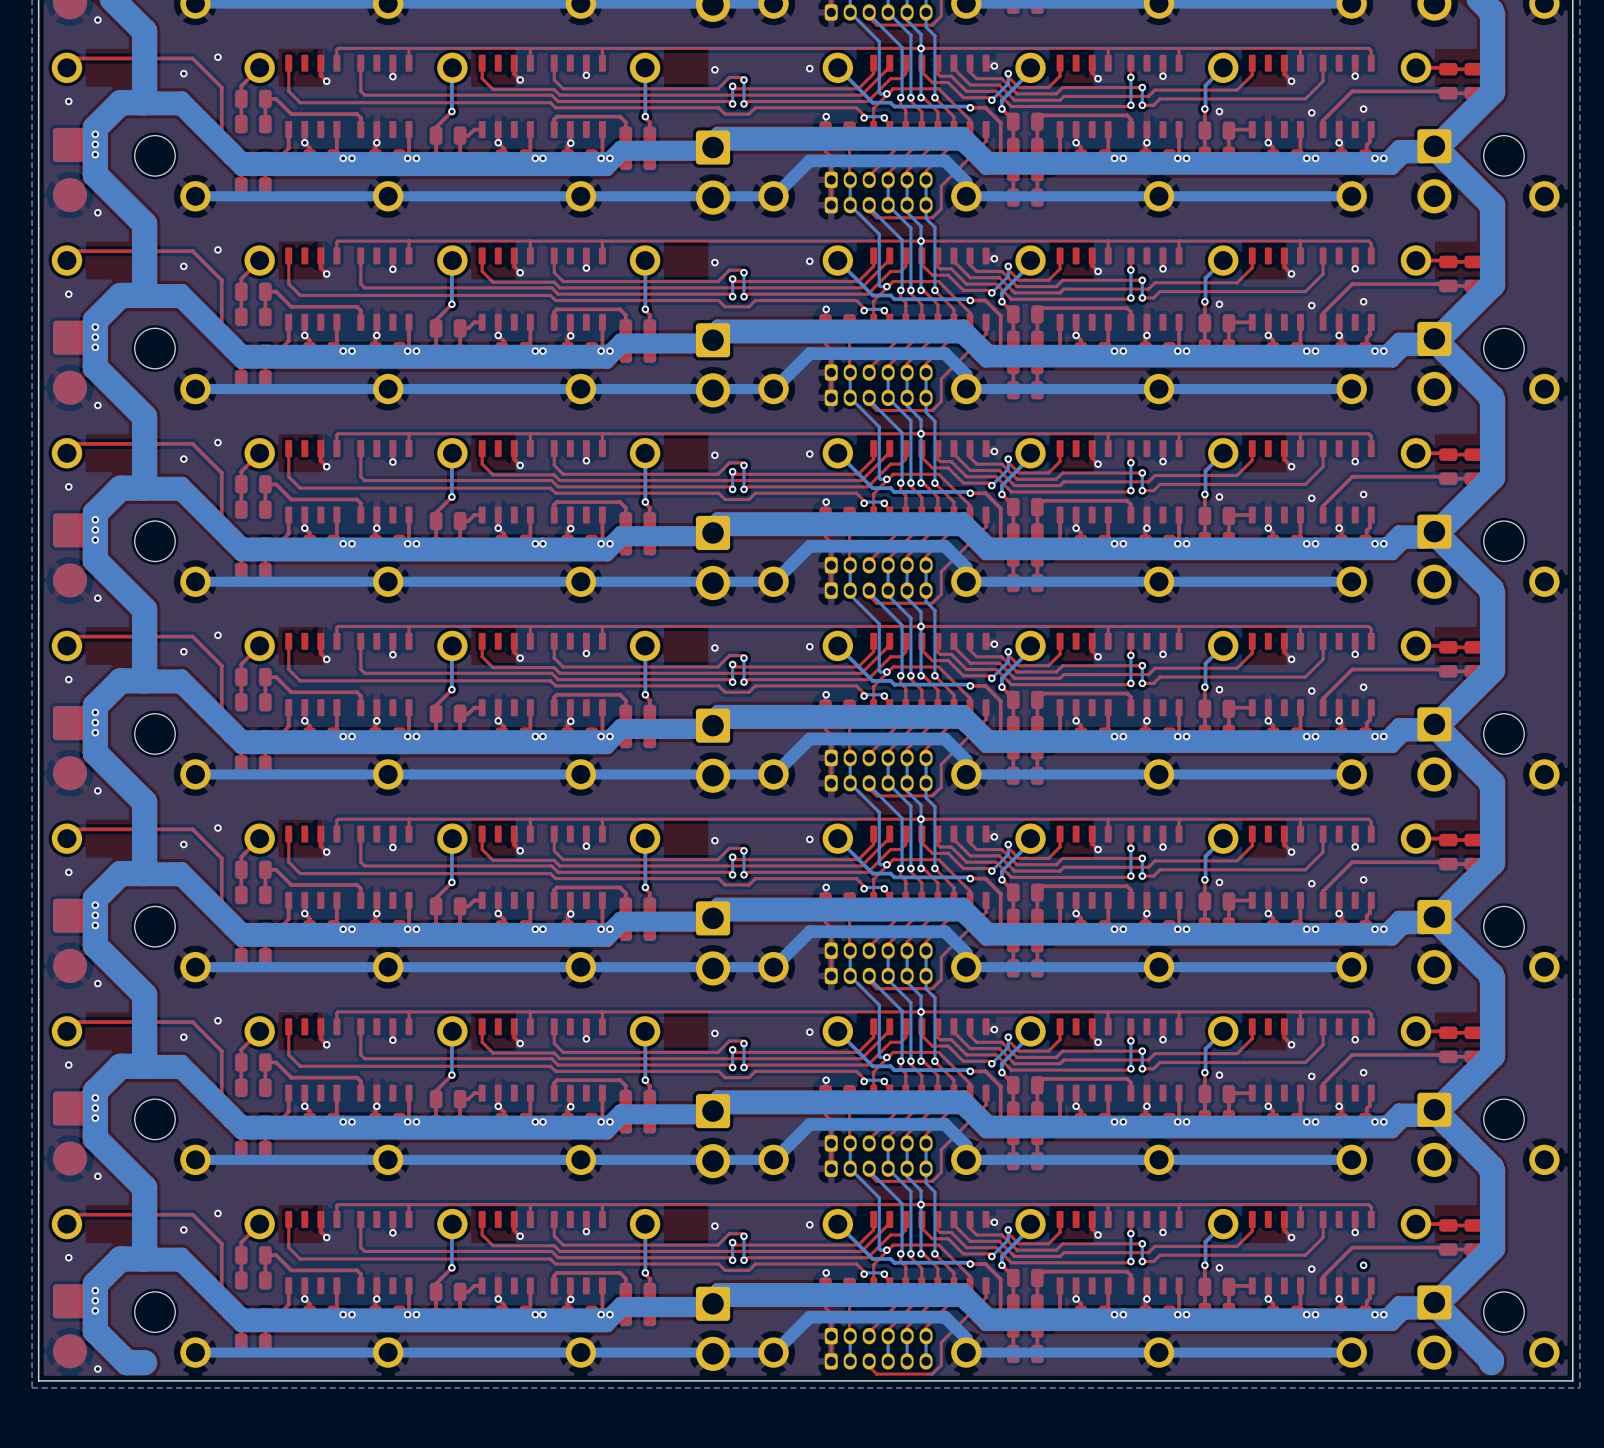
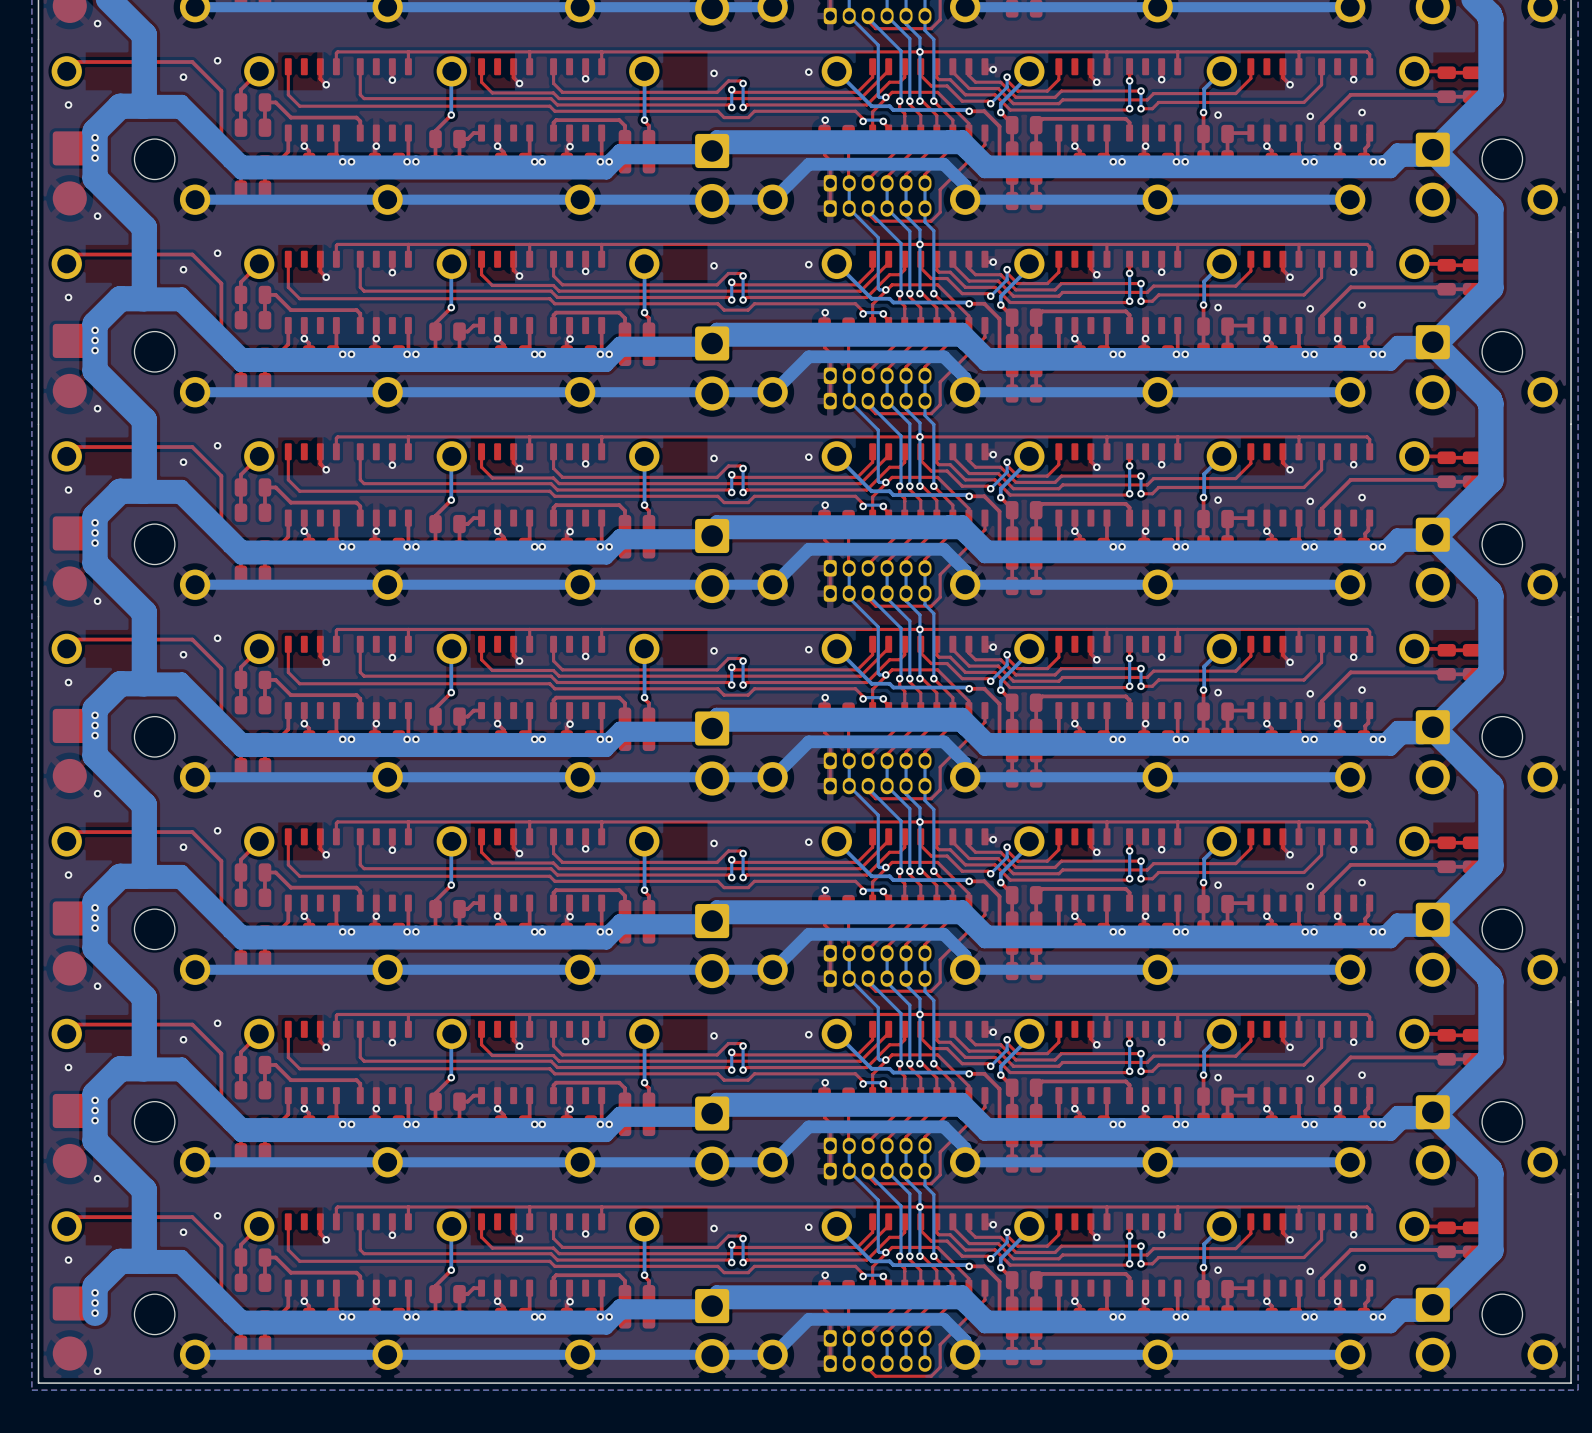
bottom track: (1434, 1303) (1491, 1360) (1491, 1362) -> none
bottom track: (95, 1311) (95, 1331) (126, 1362) (144, 1362) -> none

